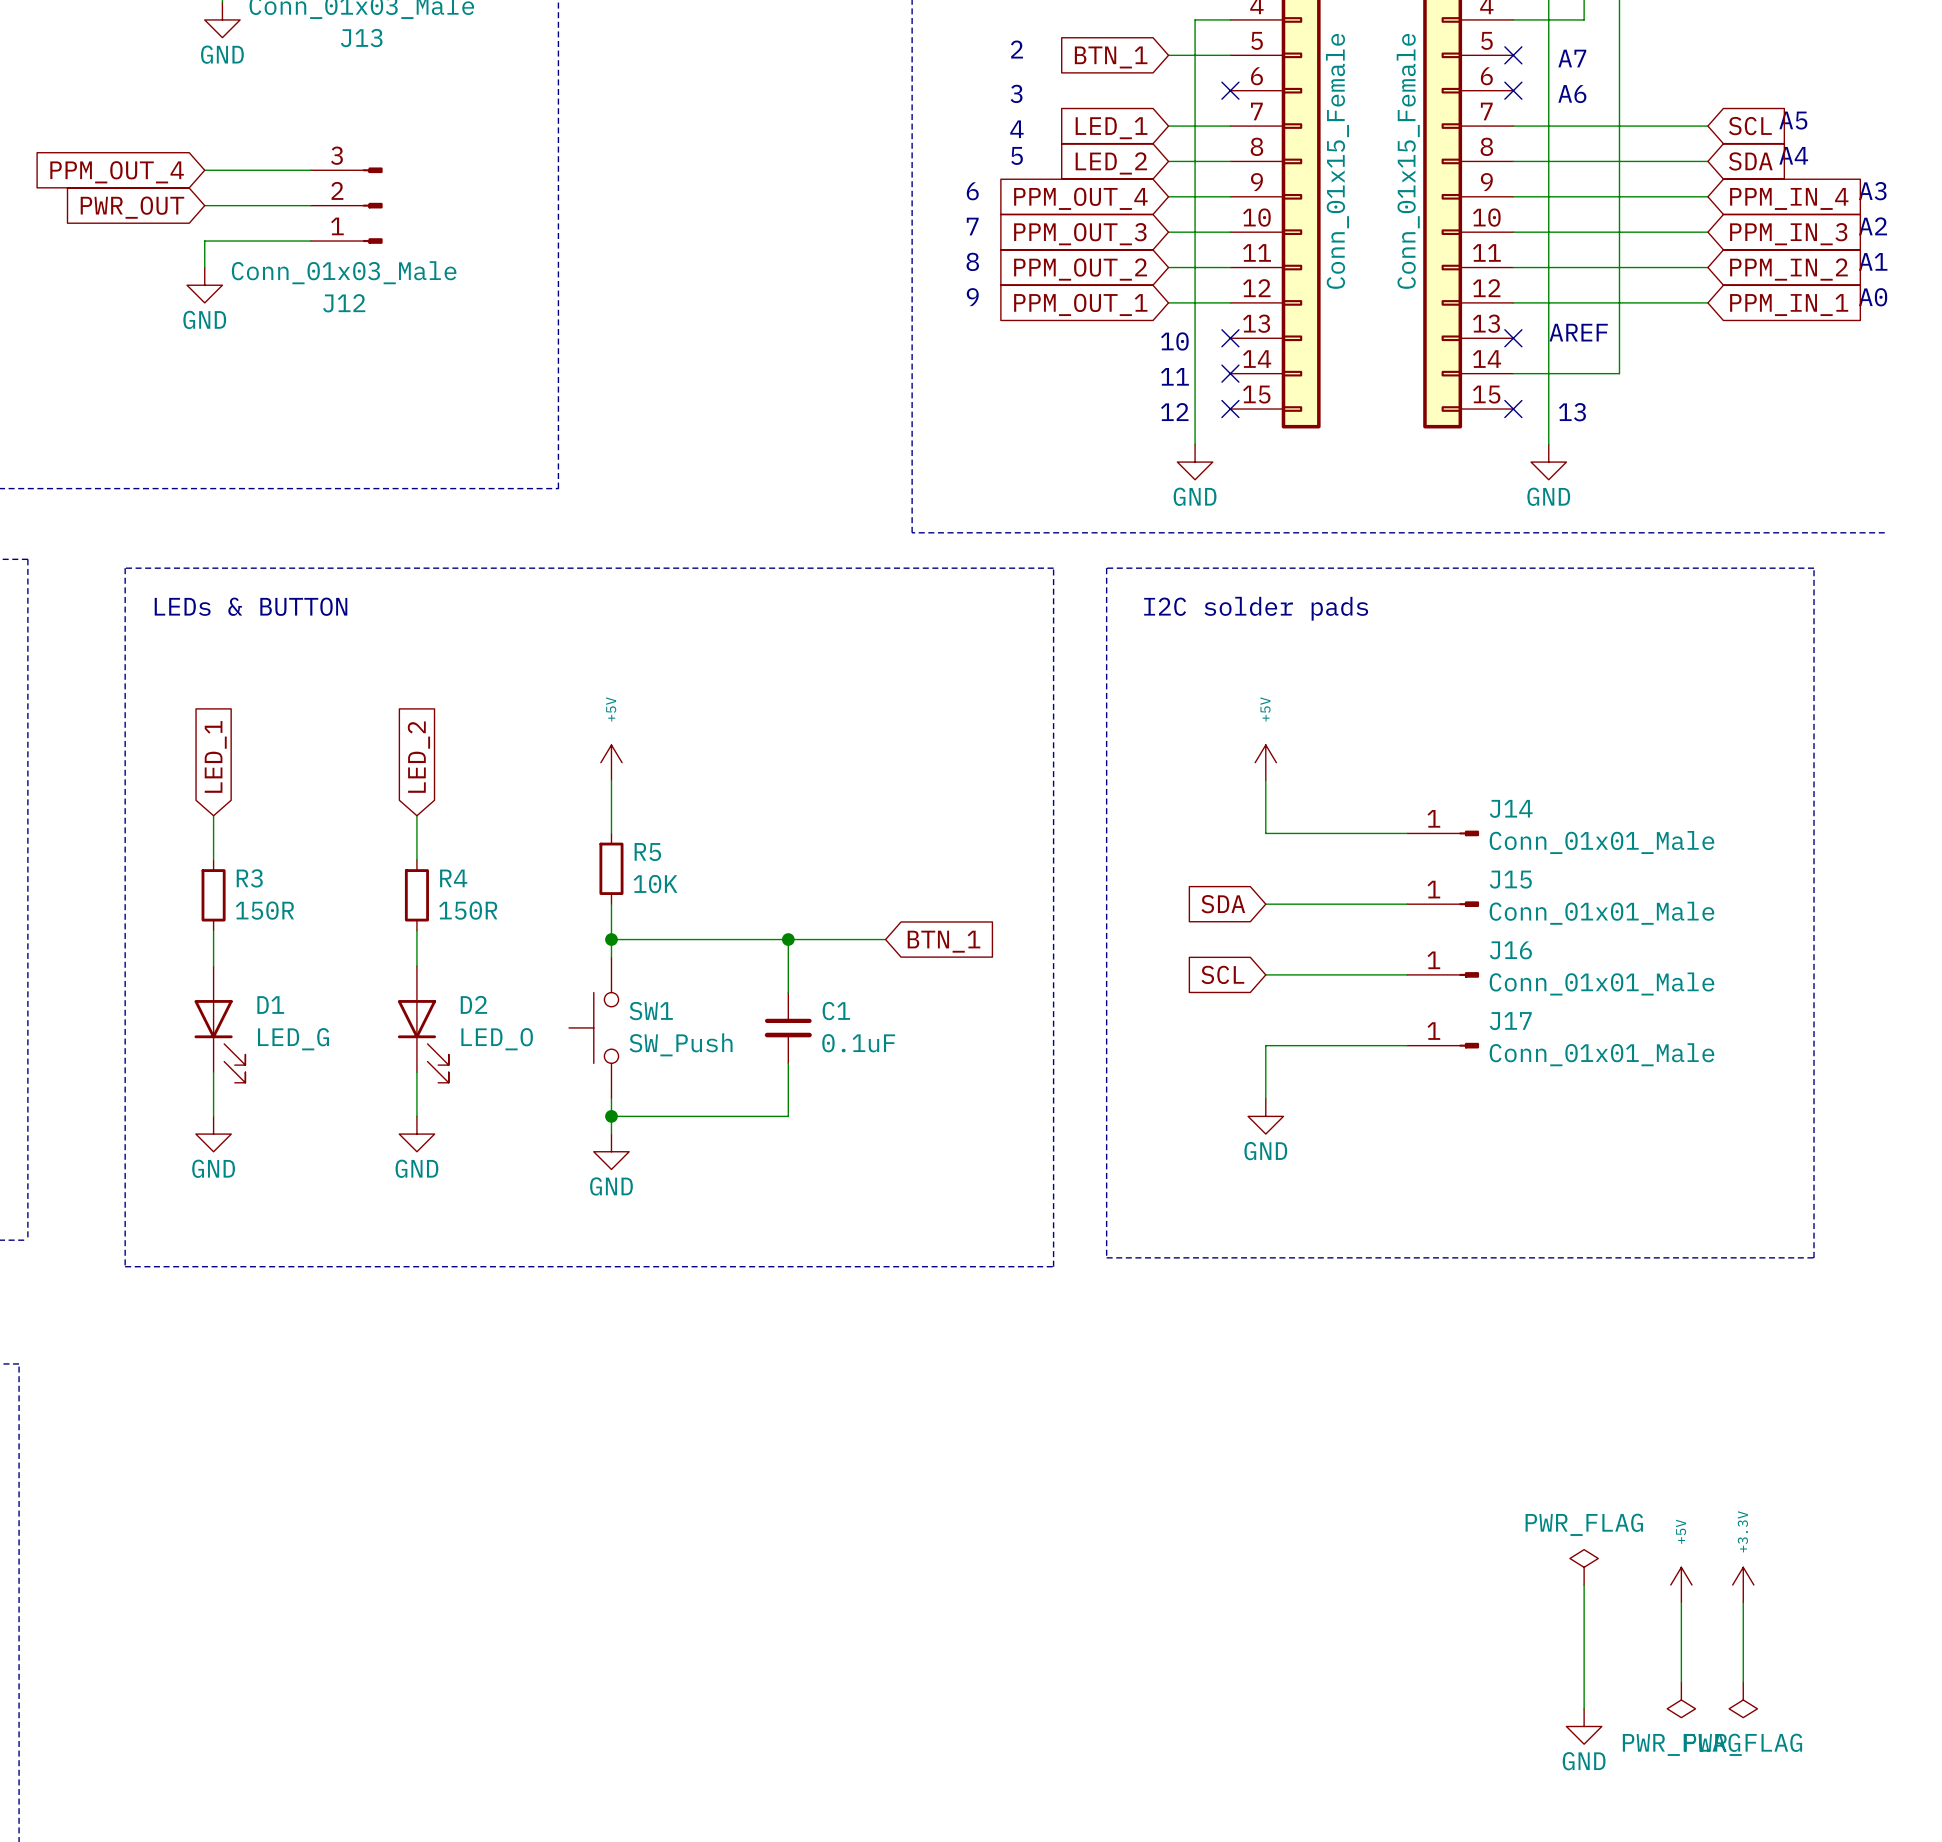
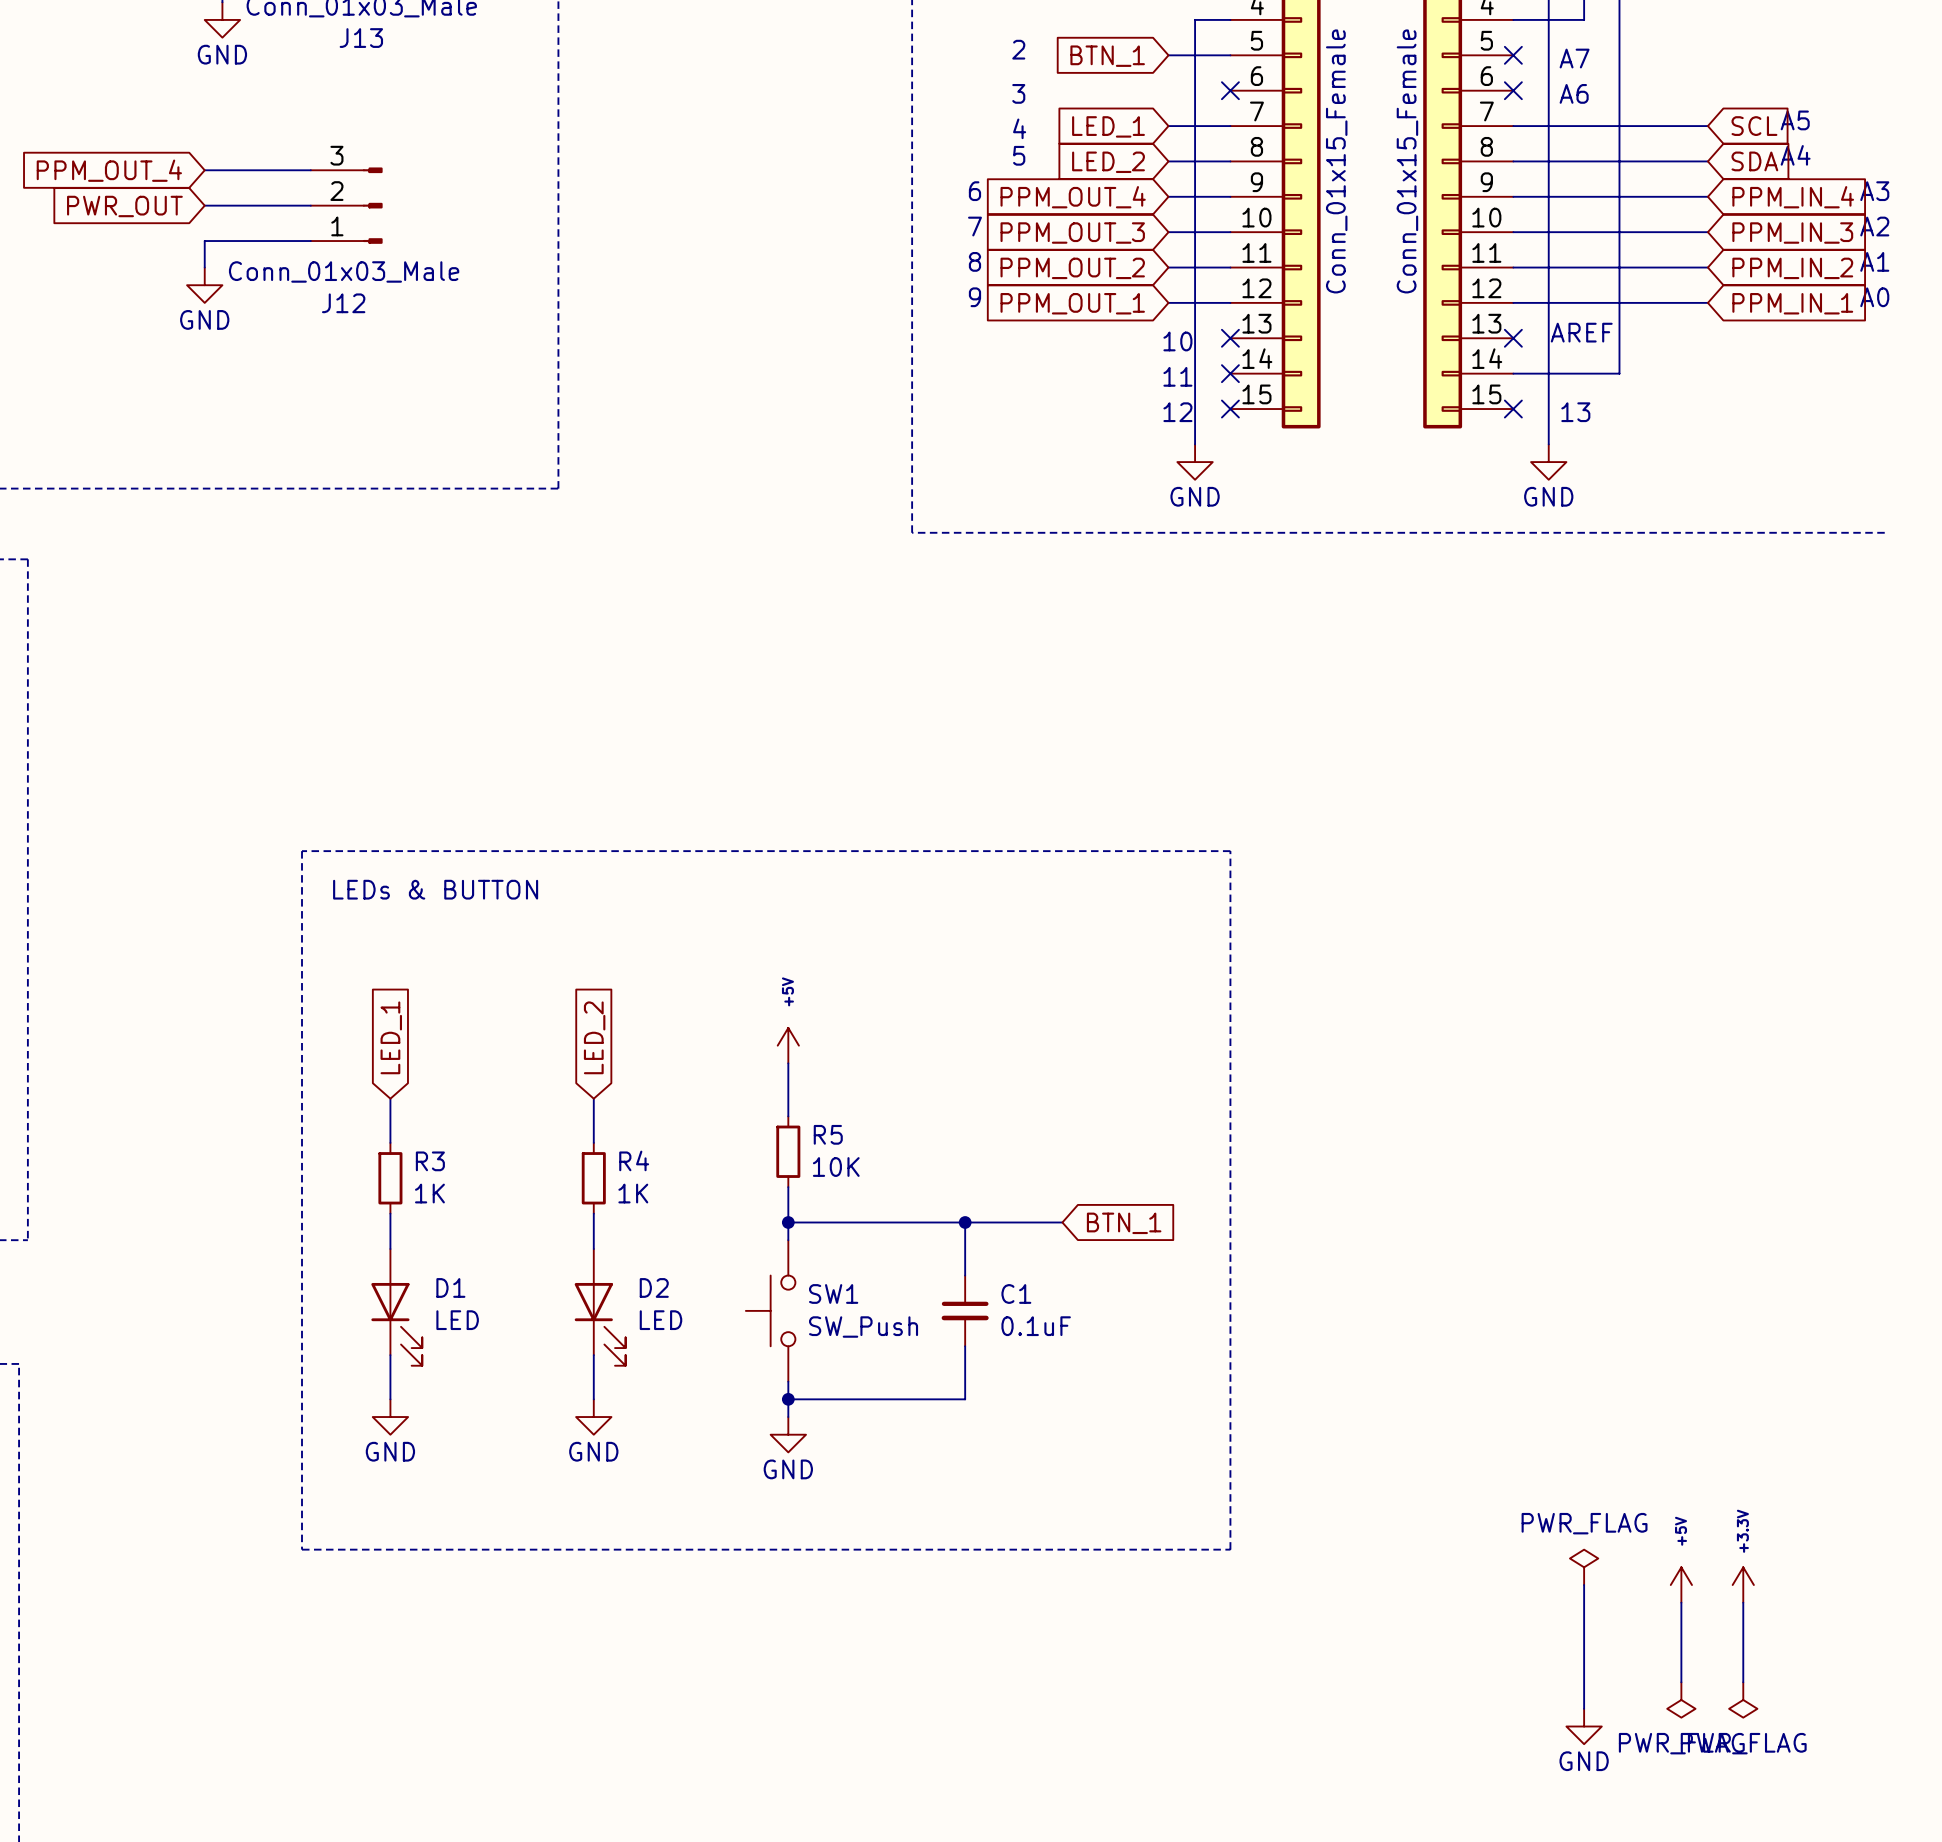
line: (125, 568) (125, 1266) (1053, 1266) (1053, 568) (125, 568) -> (302, 851) (302, 1549) (1230, 1549) (1230, 851) (302, 851)
line: (1106, 568) (1814, 568) (1814, 1257) (1106, 1257) (1106, 568) -> none
text position: LEDs & BUTTON (251, 606) -> LEDs & BUTTON (435, 889)
text: I2C solder pads (1256, 608) -> none
global label position: LED_1 (215, 756) -> LED_1 (391, 1037)
global label position: LED_2 (418, 757) -> LED_2 (594, 1037)
power symbol: +5V (611, 762) -> none
power symbol: +5V (1265, 762) -> none
wire: (611, 780) (611, 833) -> none
wire: (1265, 780) (1265, 833) (1407, 833) -> none
wire: (213, 815) (213, 859) -> (390, 1098) (390, 1142)
wire: (416, 815) (416, 859) -> (593, 1098) (593, 1142)
J14: Conn_01x01_Male (1443, 833) -> none
R5 position: (611, 868) -> (788, 1151)
R3 position: (213, 895) -> (390, 1178)
R4 position: (416, 895) -> (593, 1178)
wire: (611, 904) (611, 957) -> (788, 1187) (788, 1240)
global label: SDA (1223, 904) -> none
wire: (1265, 904) (1407, 904) -> none
J15: Conn_01x01_Male (1443, 904) -> none
R3 value: 150R (264, 910) -> 1K (429, 1193)
R4 value: 150R (468, 910) -> 1K (633, 1193)
wire: (213, 930) (213, 966) -> (390, 1213) (390, 1249)
wire: (416, 930) (416, 966) -> (593, 1213) (593, 1249)
wire: (611, 939) (885, 939) -> (788, 1222) (1062, 1222)
junction: (611, 939) -> none
wire: (788, 939) (788, 992) -> (965, 1222) (965, 1275)
junction: (788, 939) -> none
global label position: BTN_1 (944, 941) -> BTN_1 (1124, 1223)
global label: SCL (1222, 974) -> none
wire: (1265, 974) (1407, 974) -> none
J16: Conn_01x01_Male (1443, 974) -> none
D1 position: (219, 1024) -> (396, 1307)
D2 position: (423, 1024) -> (600, 1307)
SW1 position: (593, 1027) -> (770, 1310)
C1 position: (788, 1027) -> (965, 1310)
D1 value: LED_G (293, 1039) -> LED (457, 1320)
D2 value: LED_O (497, 1039) -> LED (660, 1320)
power symbol: none -> +5V (788, 1045)
wire: (1407, 1045) (1265, 1045) (1265, 1098) -> none
J17: Conn_01x01_Male (1443, 1045) -> none
wire: (213, 1072) (213, 1116) -> (390, 1355) (390, 1399)
wire: (416, 1072) (416, 1116) -> (593, 1355) (593, 1399)
wire: (611, 1098) (611, 1134) -> (788, 1381) (788, 1417)
wire: (611, 1116) (788, 1116) -> none
junction: (611, 1116) -> none
power symbol: GND (1265, 1116) -> none
power symbol: GND (213, 1134) -> none
power symbol: GND (416, 1134) -> none
power symbol: GND (611, 1151) -> none
junction: none -> (788, 1222)
junction: none -> (965, 1222)
wire: none -> (965, 1346) (965, 1399) (788, 1399)
junction: none -> (788, 1399)
power symbol: none -> GND (390, 1417)
power symbol: none -> GND (593, 1417)
power symbol: none -> GND (788, 1434)

